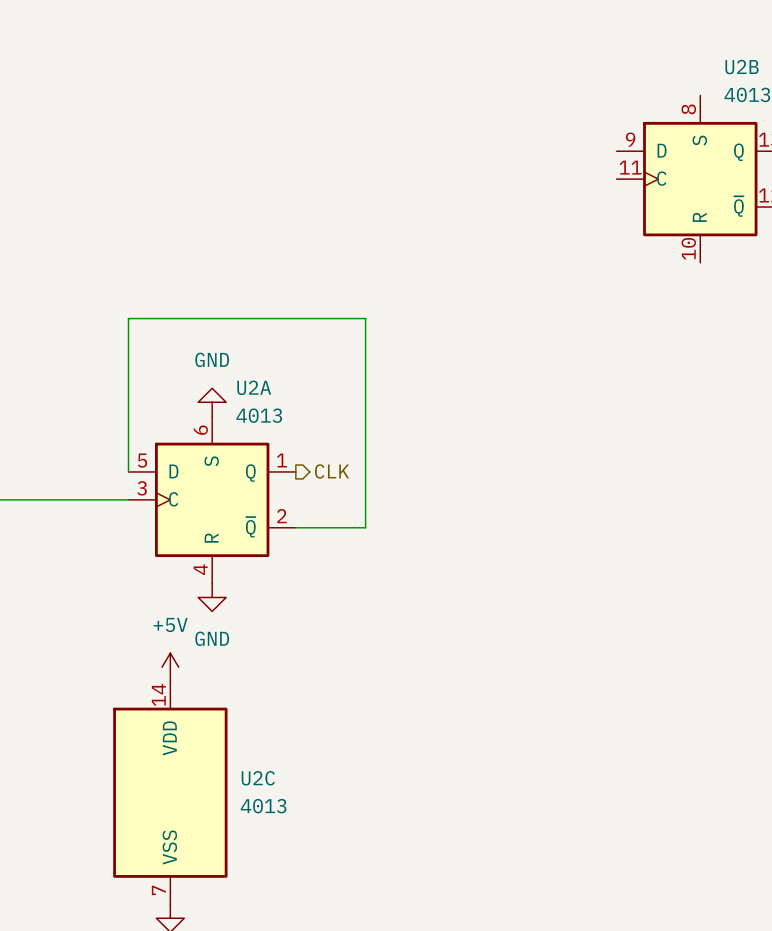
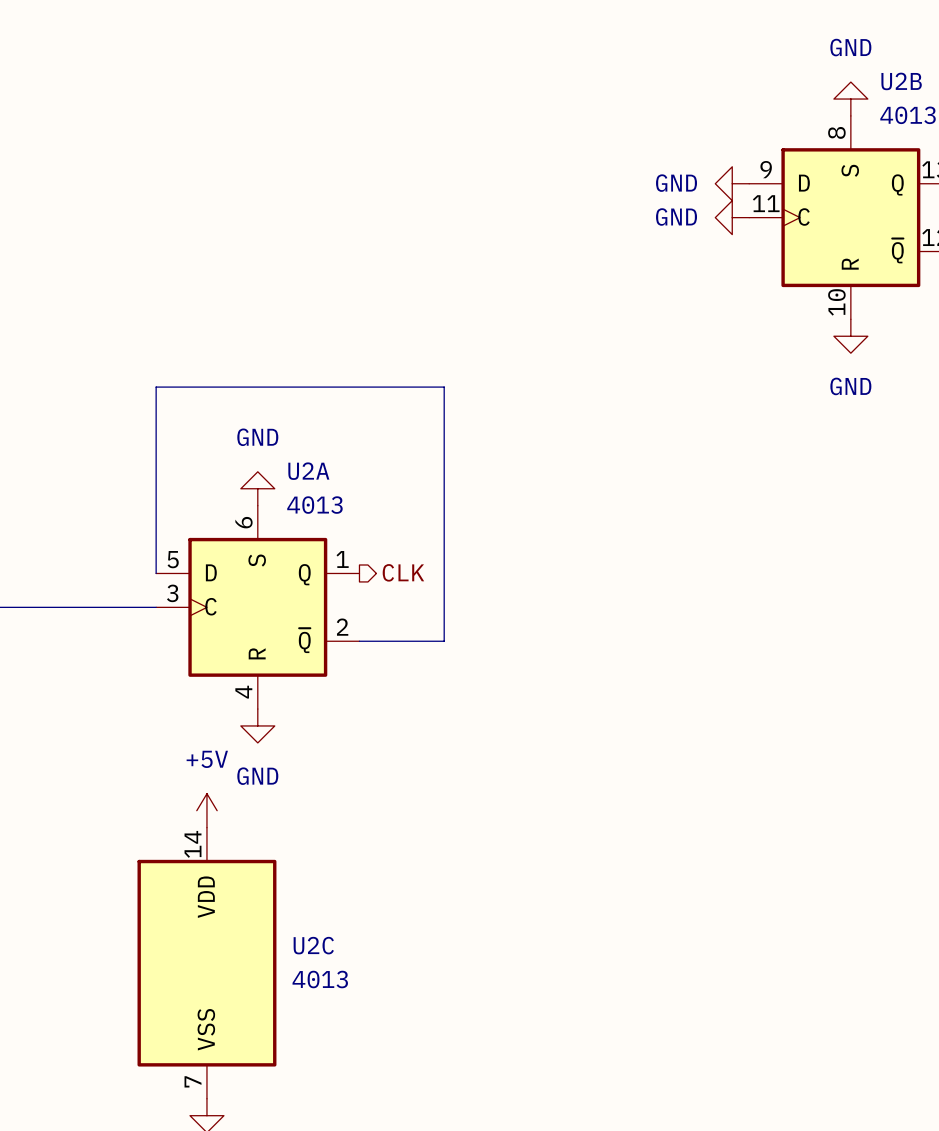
power symbol: none -> GND (850, 99)
power symbol: none -> GND (732, 183)
power symbol: none -> GND (732, 217)
power symbol: none -> GND (850, 336)

